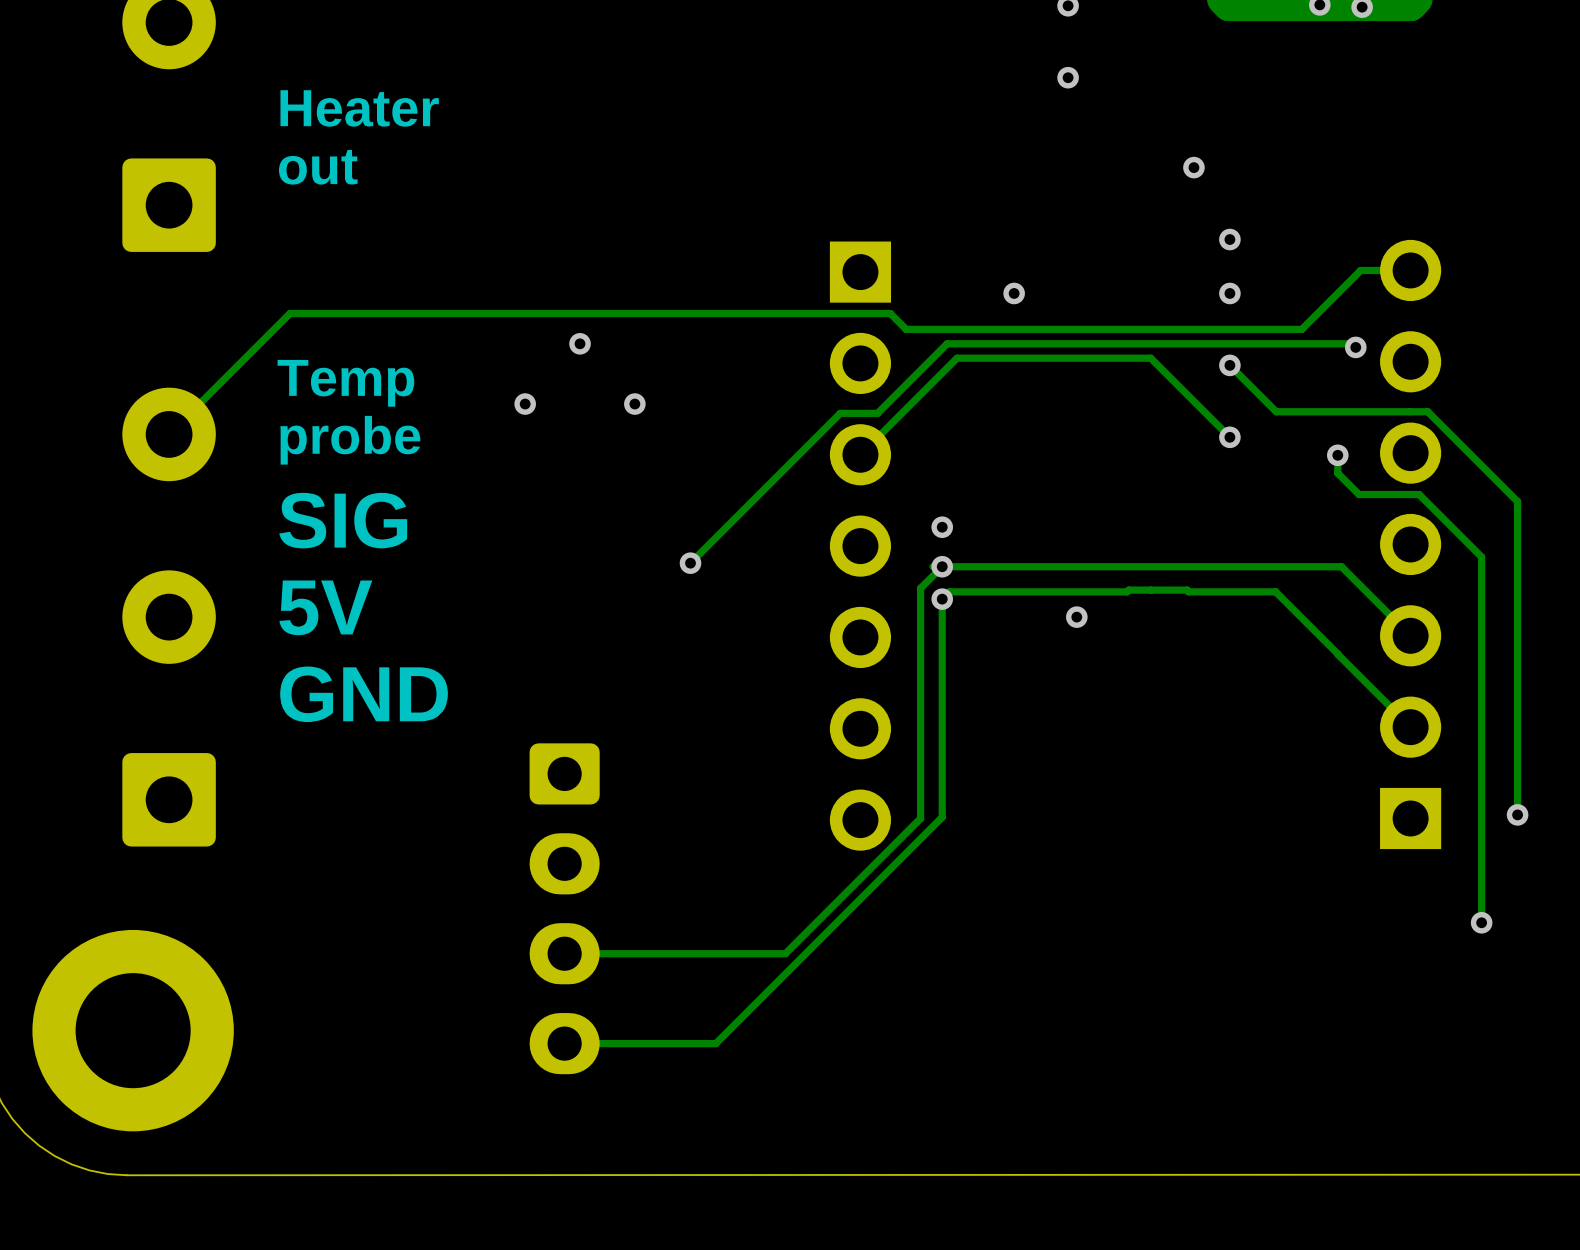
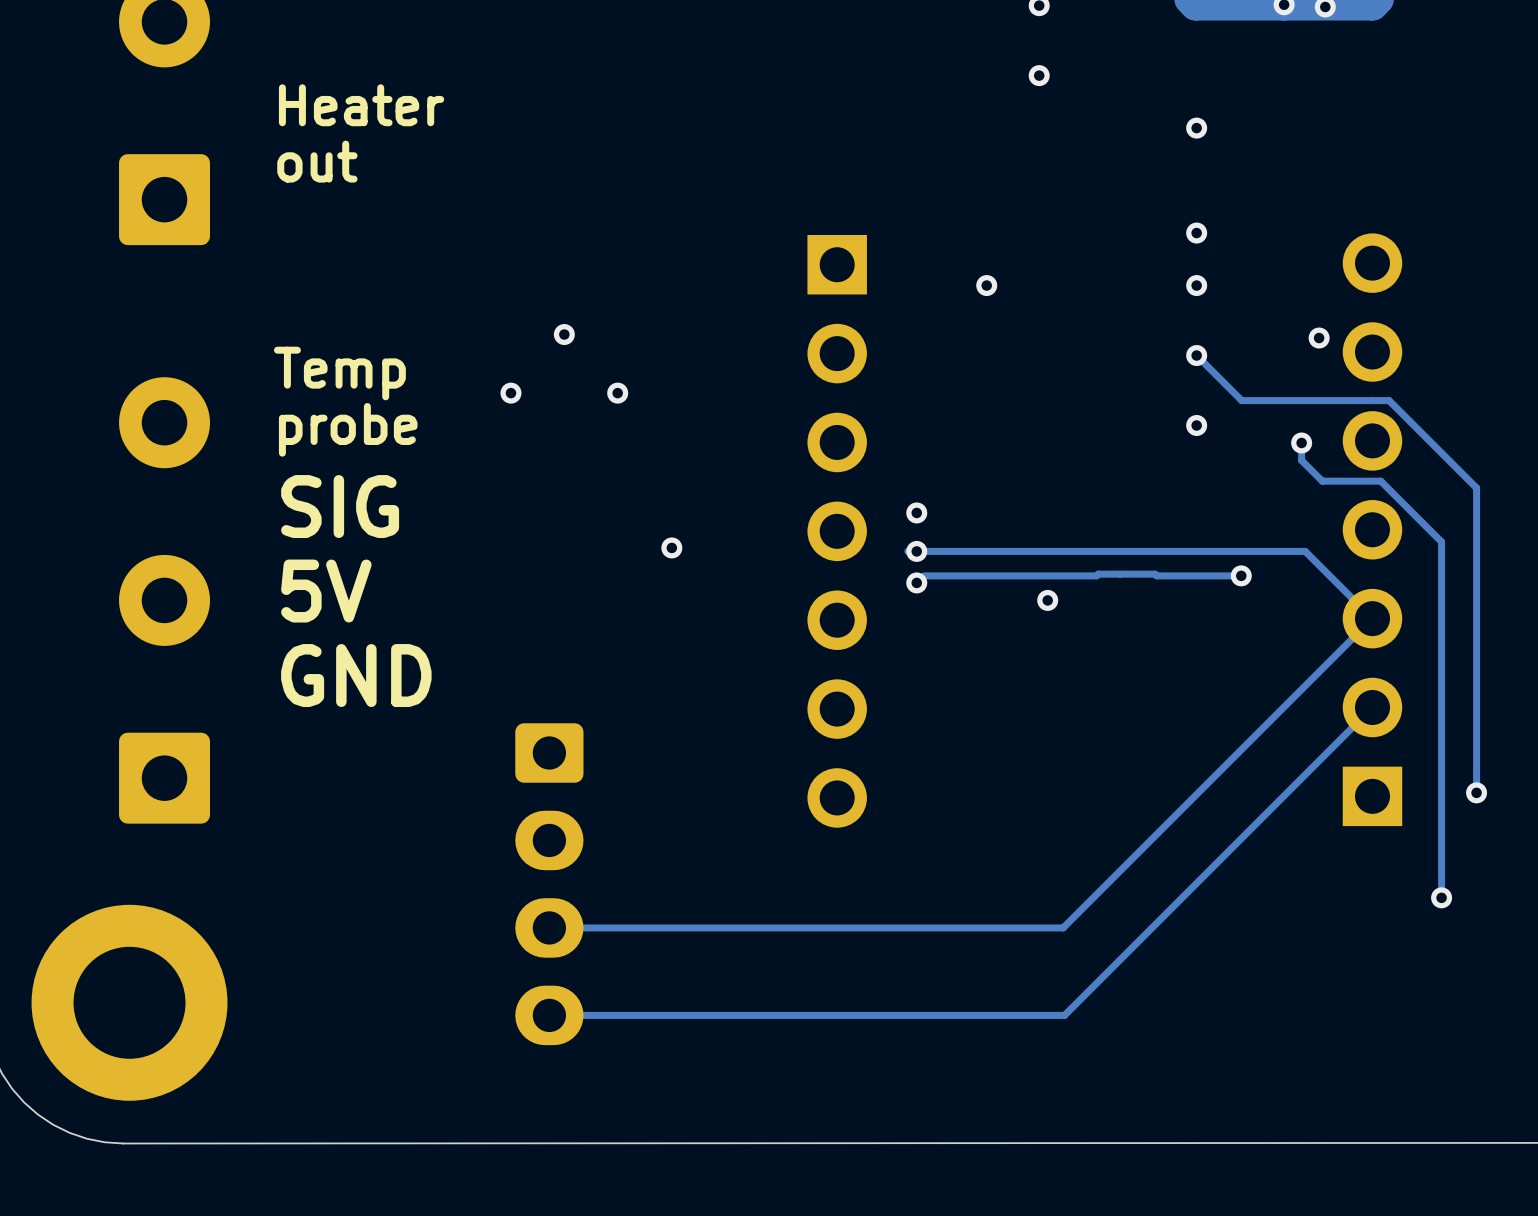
via position: (1193, 167) -> (1196, 128)
track: (1410, 270) (1360, 270) (1301, 329) (906, 329) (890, 313) (290, 313) (169, 434) -> none
track: (1352, 343) (947, 343) (877, 413) (840, 413) (690, 563) -> none
track: (1229, 437) (1150, 358) (957, 358) (860, 454) -> none
track: (942, 566) (920, 588) (920, 818) (785, 953) -> (1372, 618) (1063, 927) (764, 927)
track: (949, 591) (942, 599) (942, 817) (715, 1043) -> (1372, 707) (1064, 1015) (696, 1015)
track: (1275, 591) (1337, 653) -> none
via: none -> (1241, 575)
track: (1337, 654) (1410, 727) -> none

